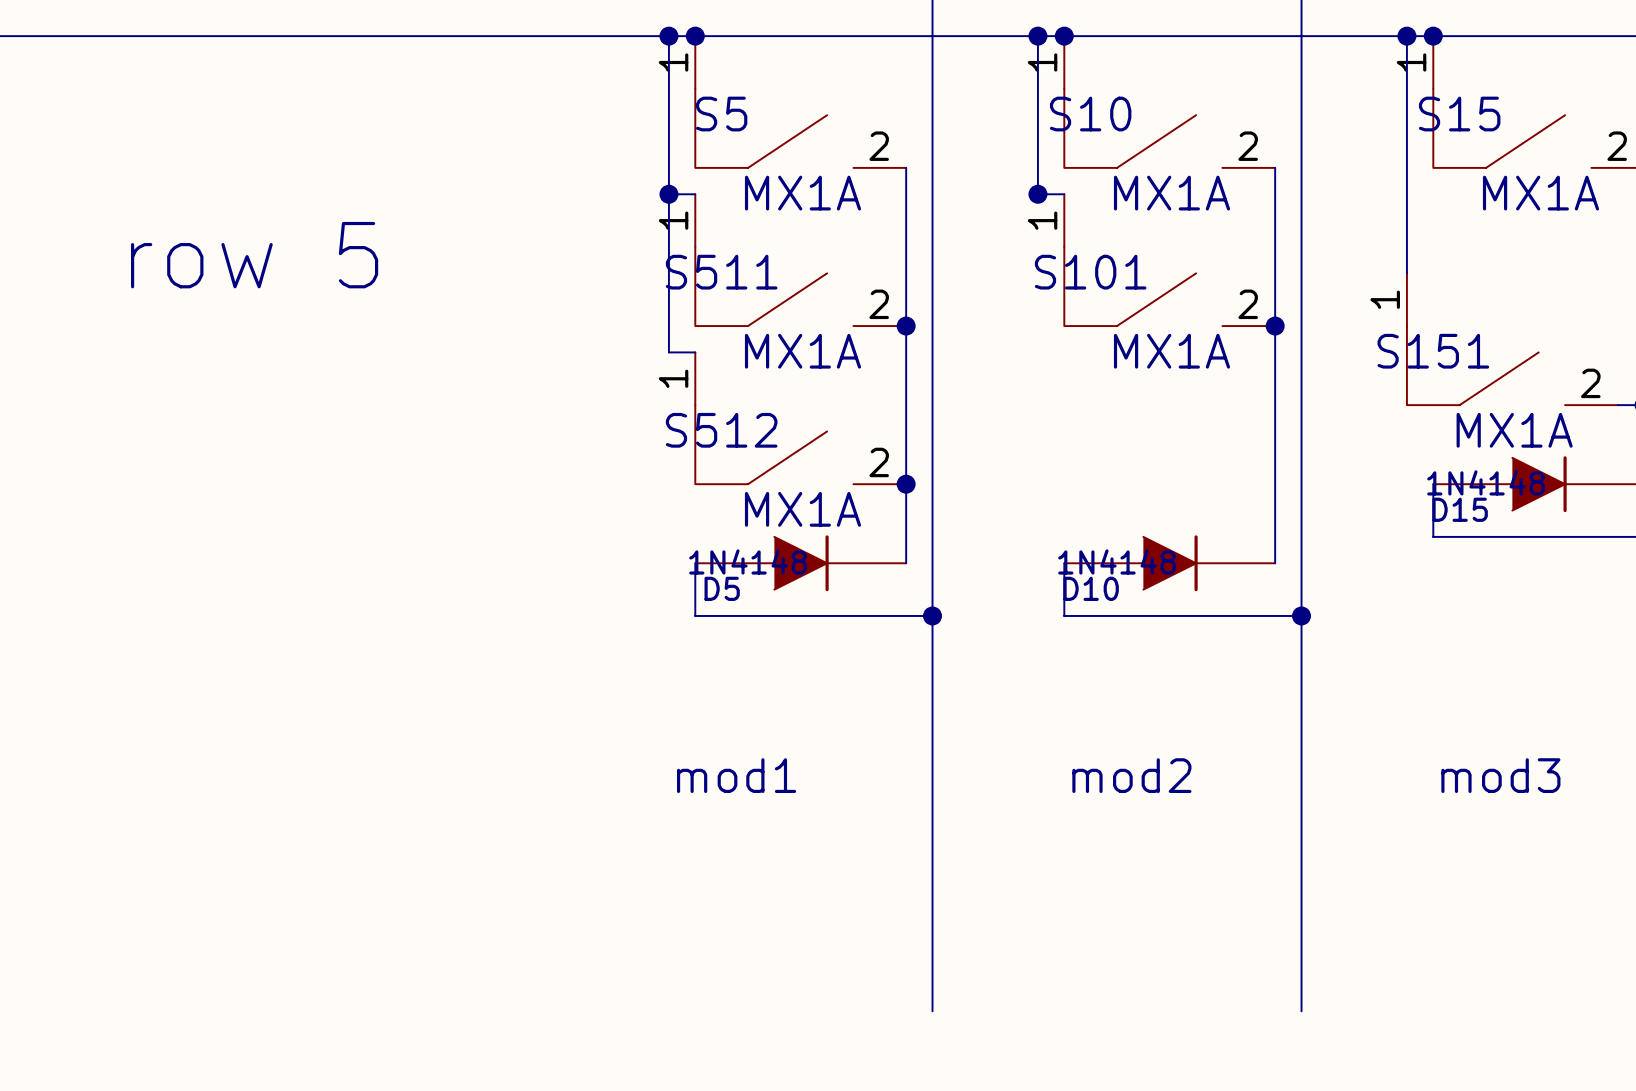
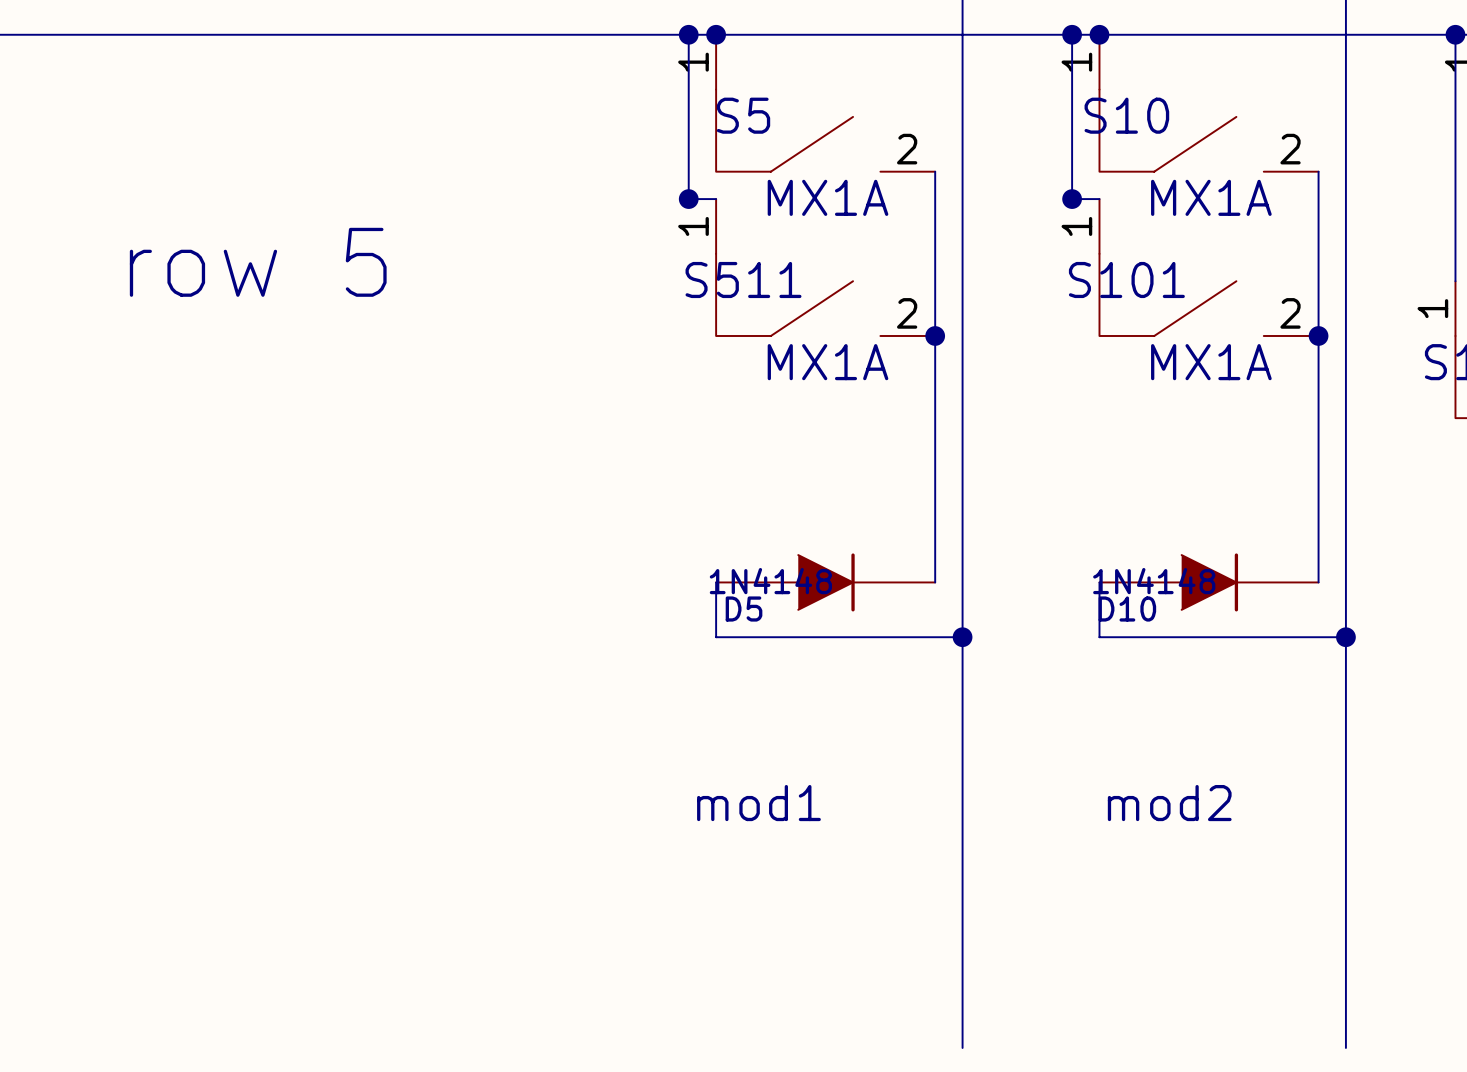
wire: (668, 194) (668, 352) (695, 352) -> none
S512: MX1A (800, 418) -> none
junction: (906, 484) -> none

